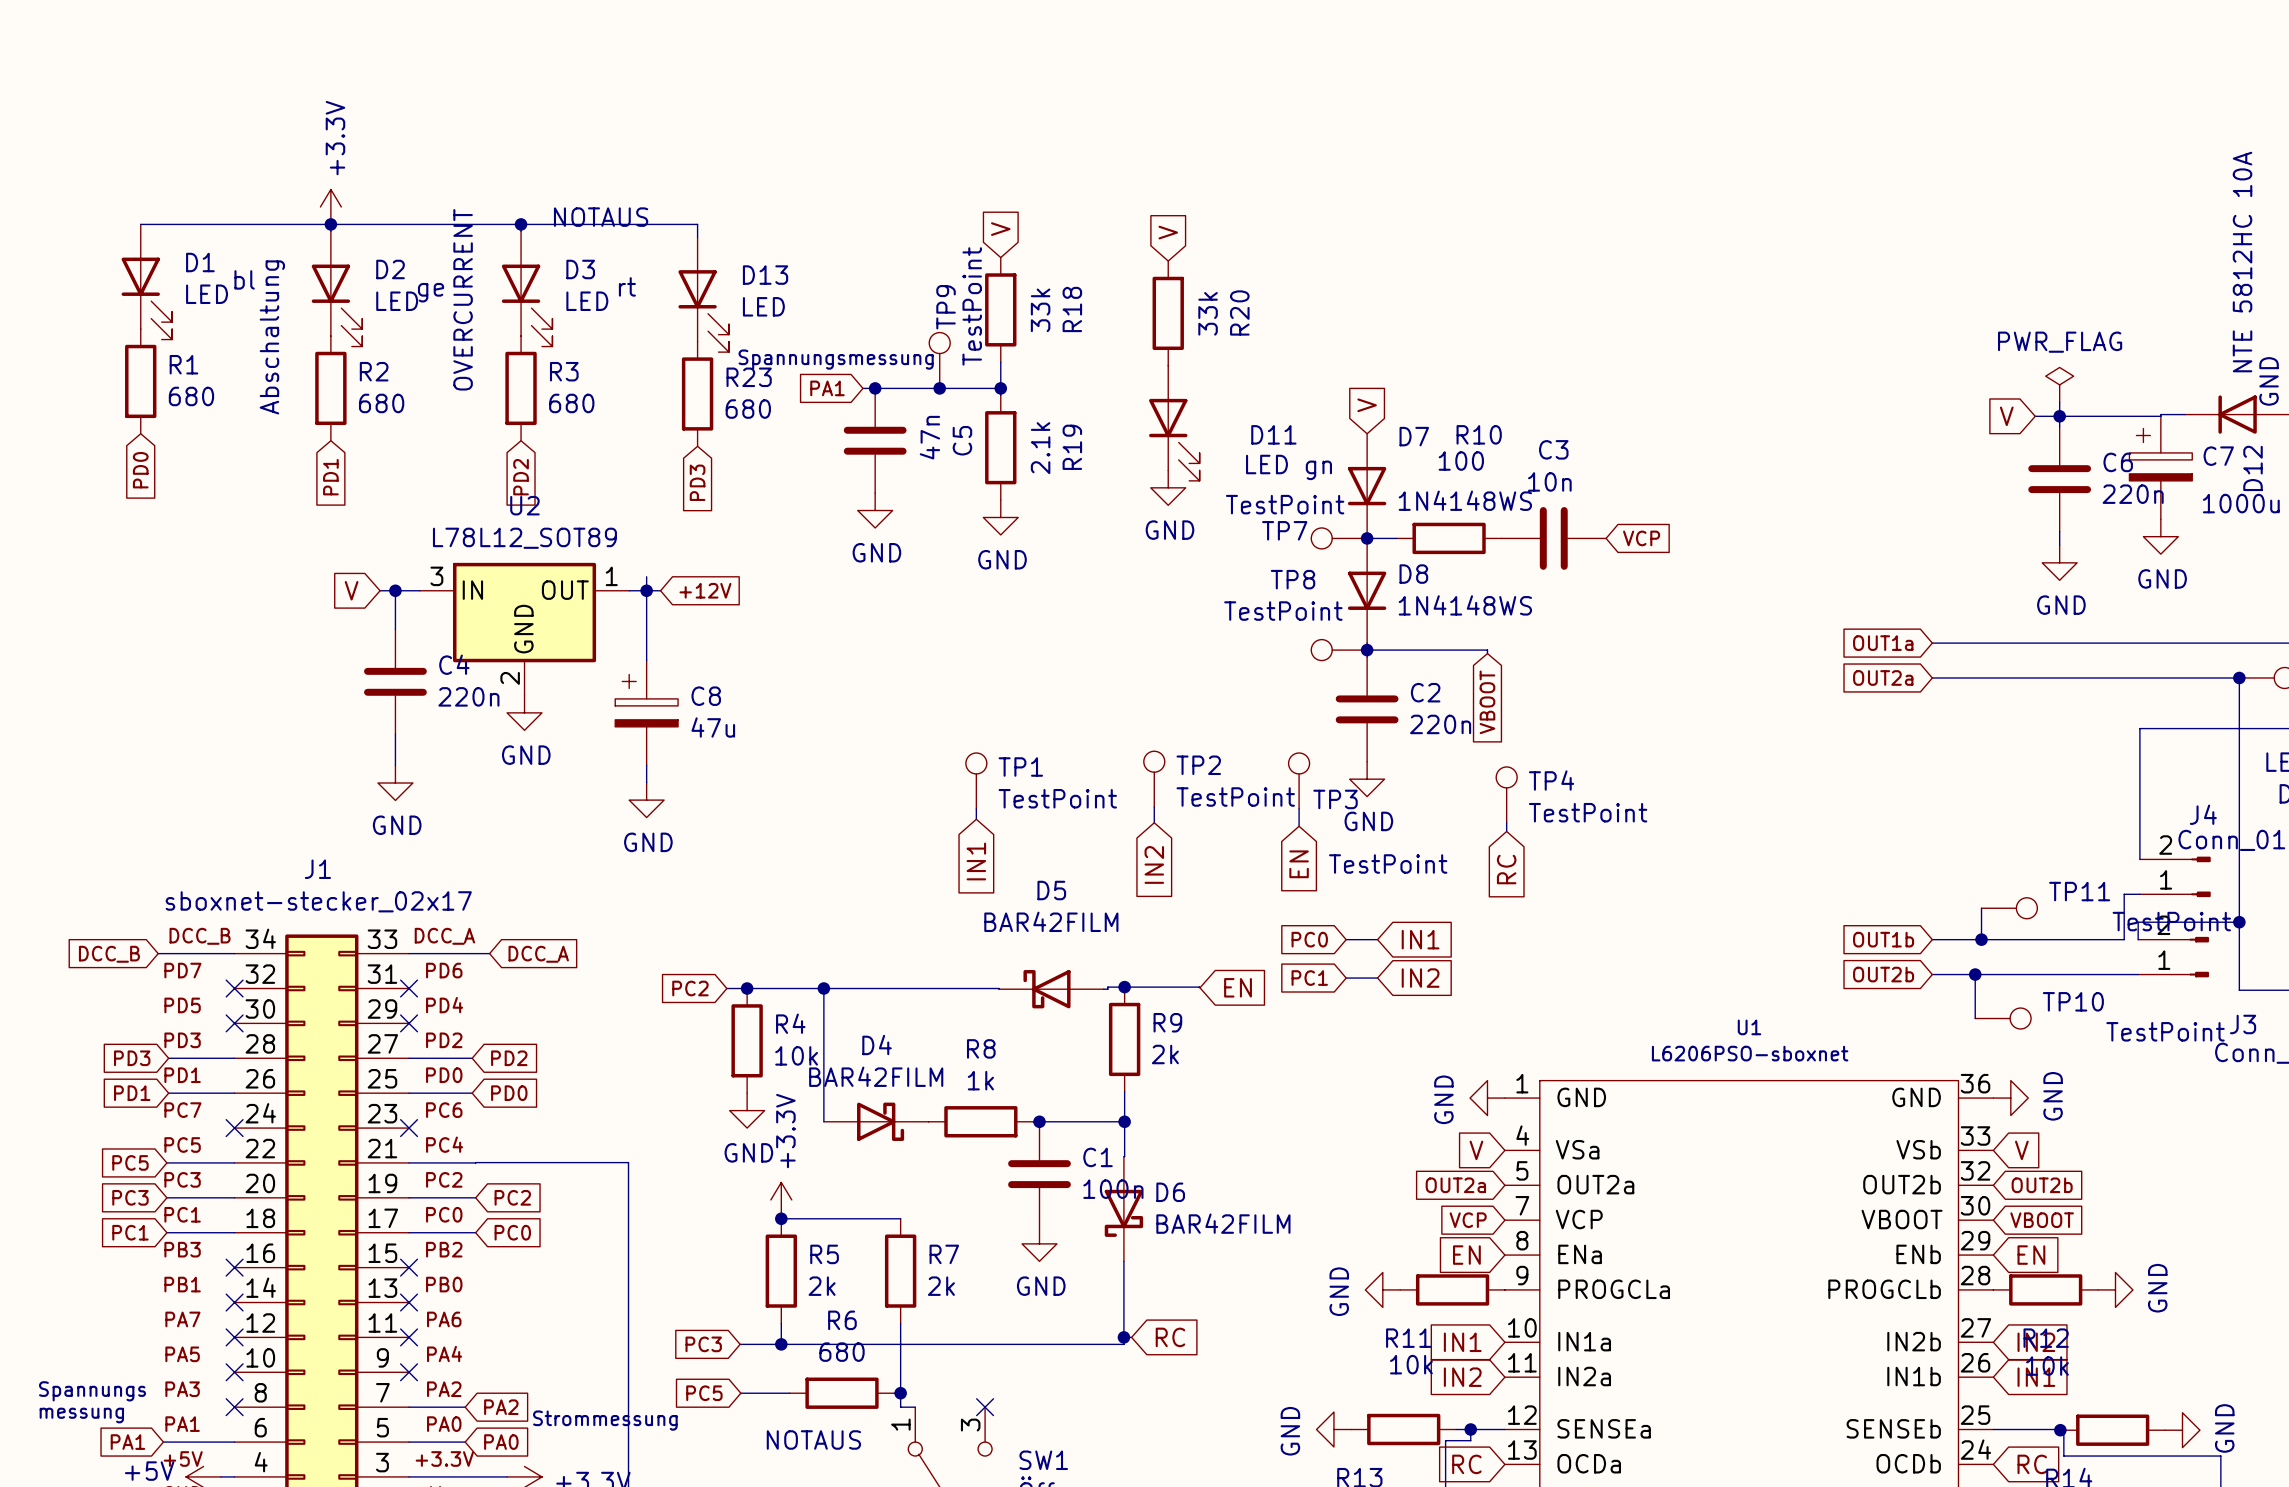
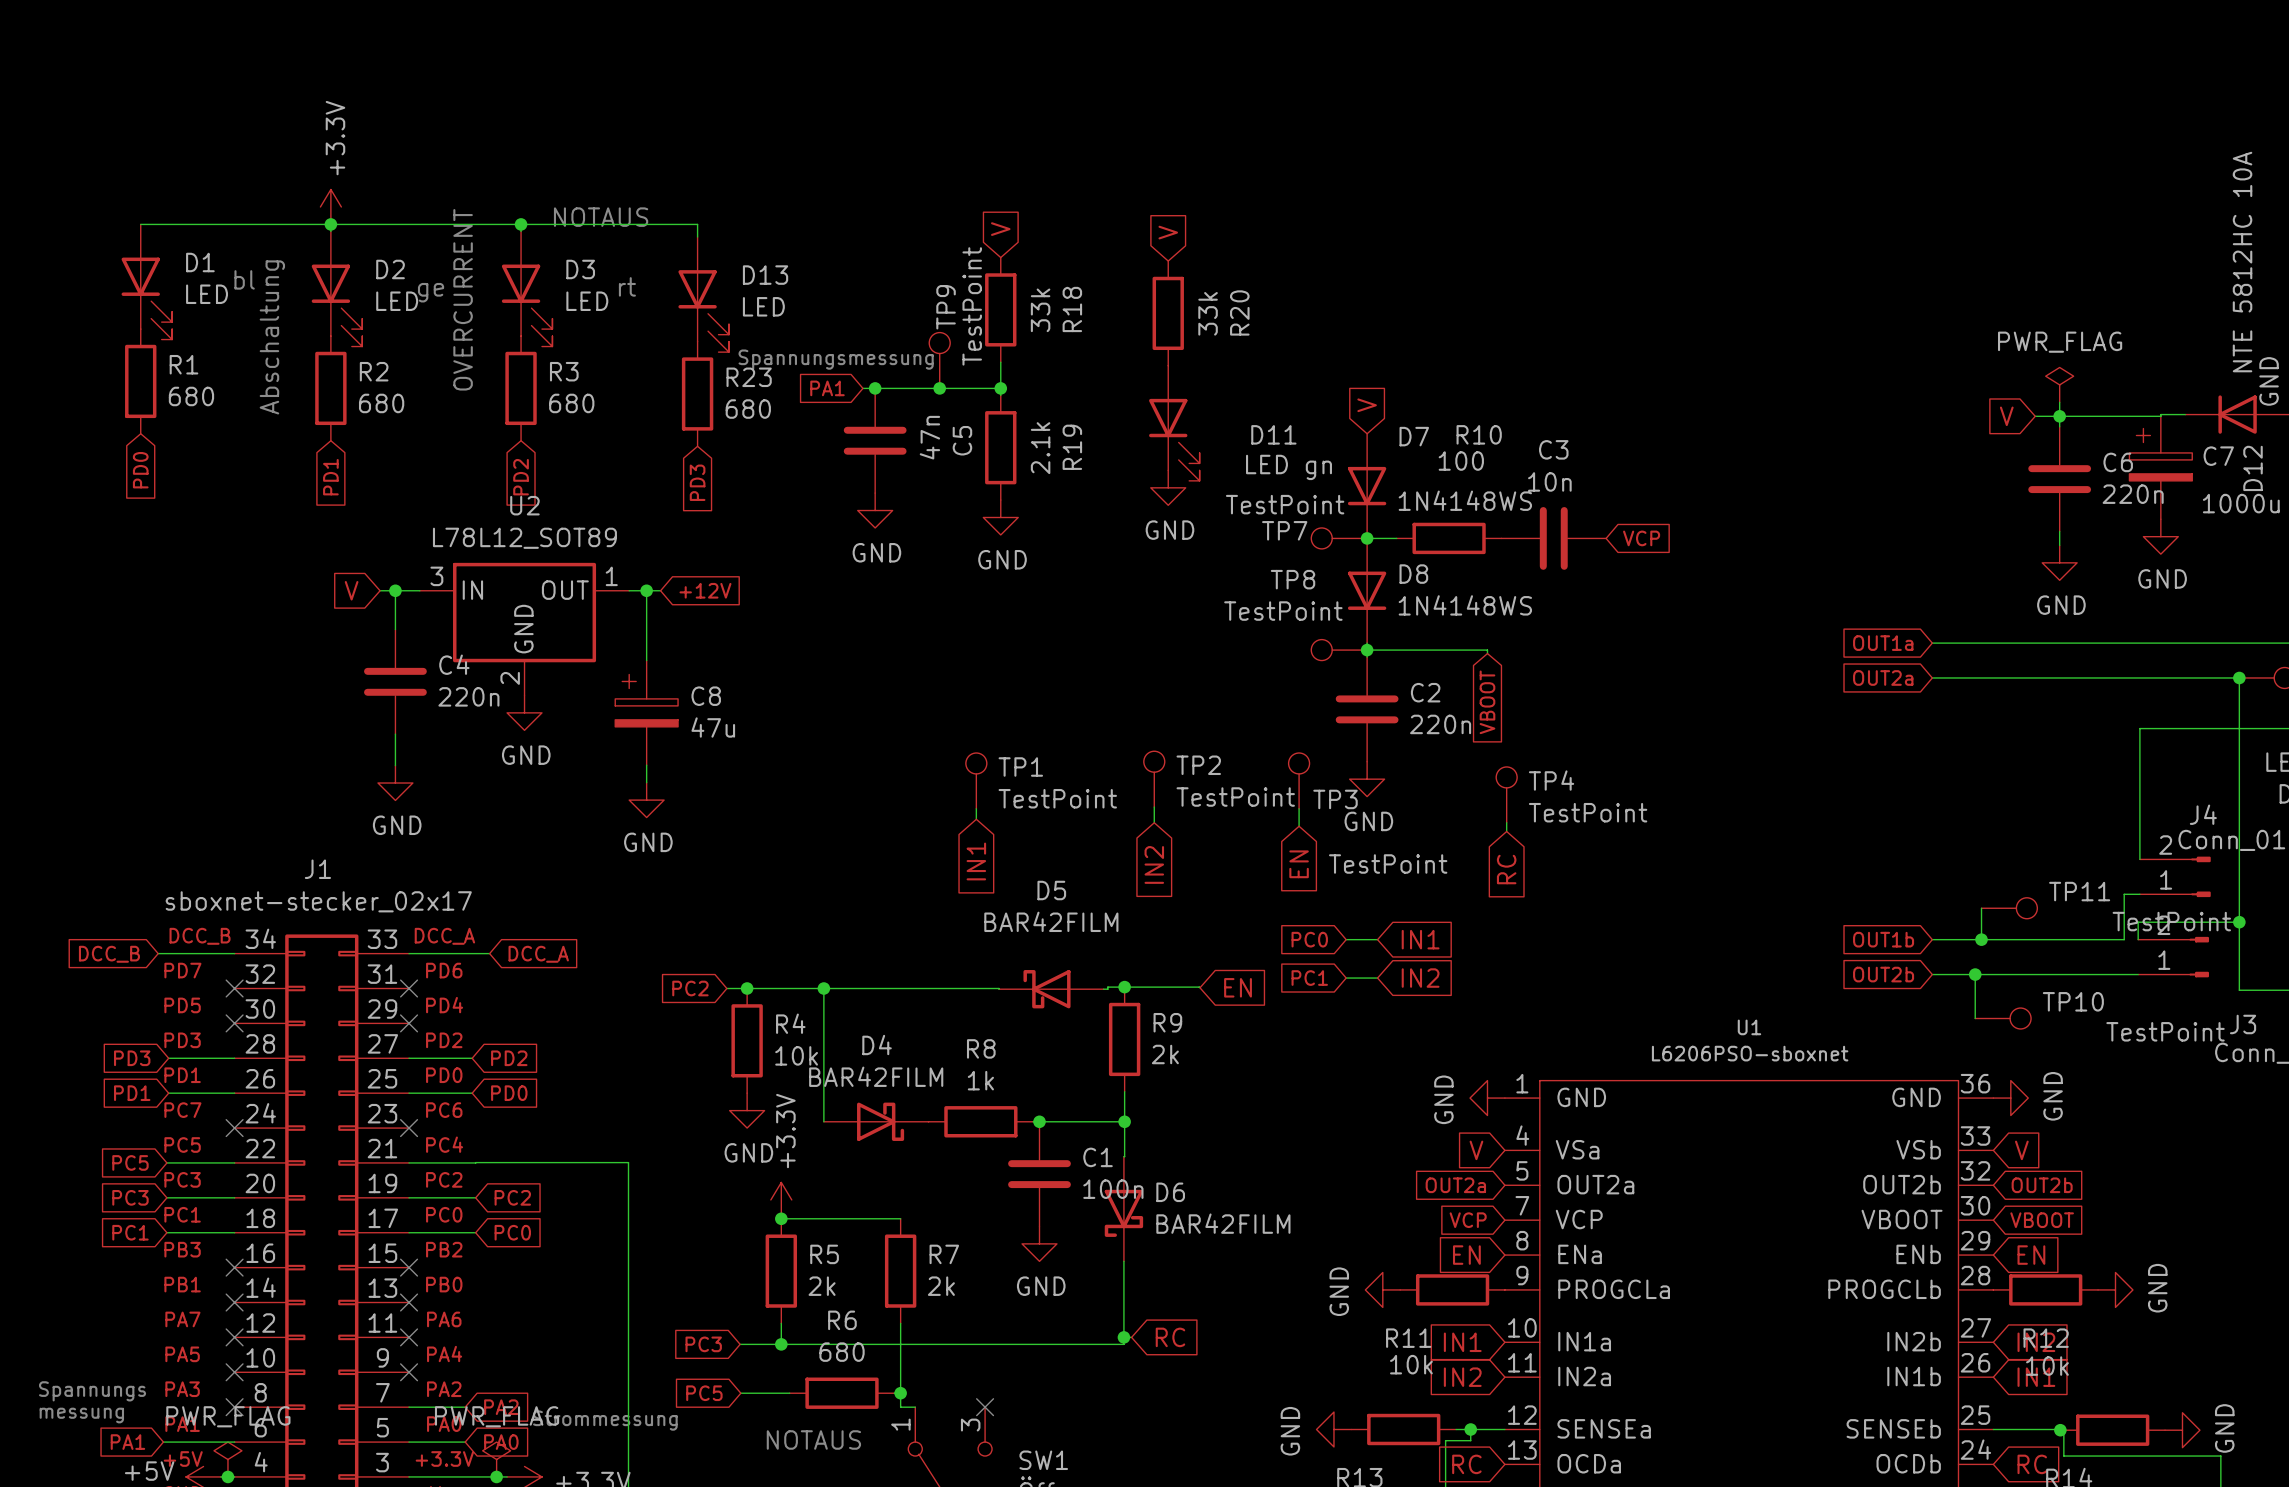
wire: (646, 576) (646, 590) -> none
power symbol: none -> PWR_FLAG (227, 1459)
power symbol: none -> PWR_FLAG (496, 1459)
junction: none -> (227, 1476)
junction: none -> (496, 1476)

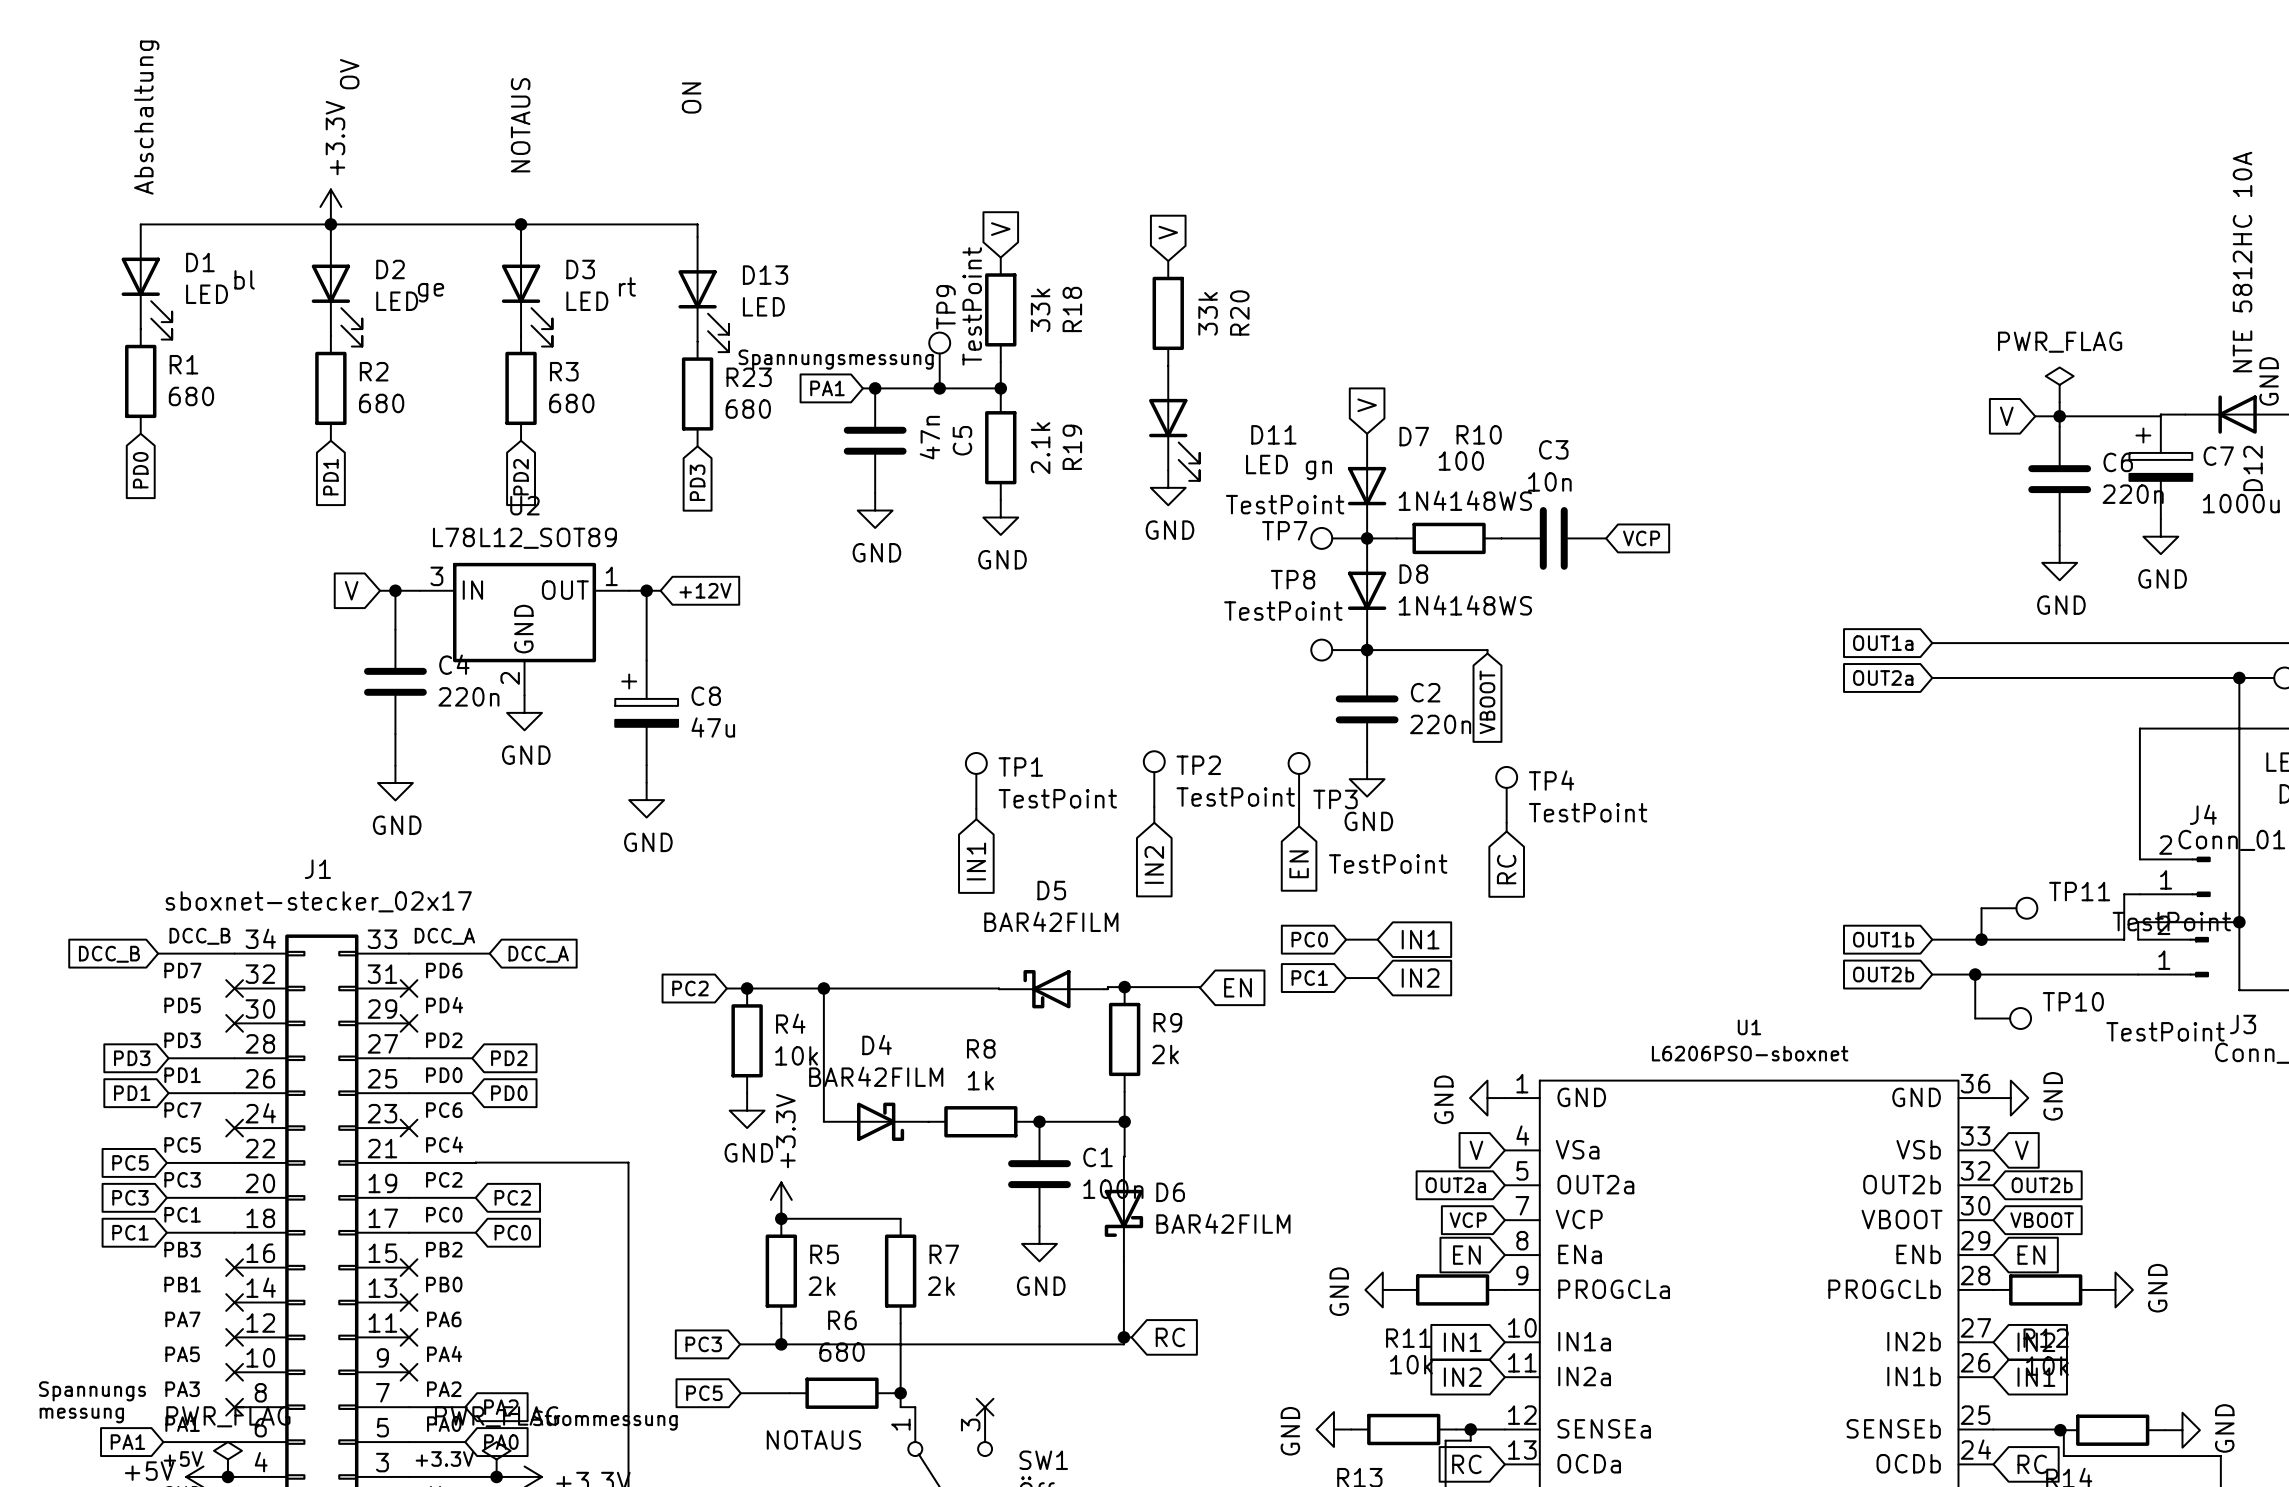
text: none -> OV (349, 74)
text: none -> ON (691, 98)
text rotation: 0° (601, 217) -> 90° counterclockwise (520, 125)
text: OVERCURRENT (463, 299) -> none
text position: Abschaltung (272, 337) -> Abschaltung (146, 117)

